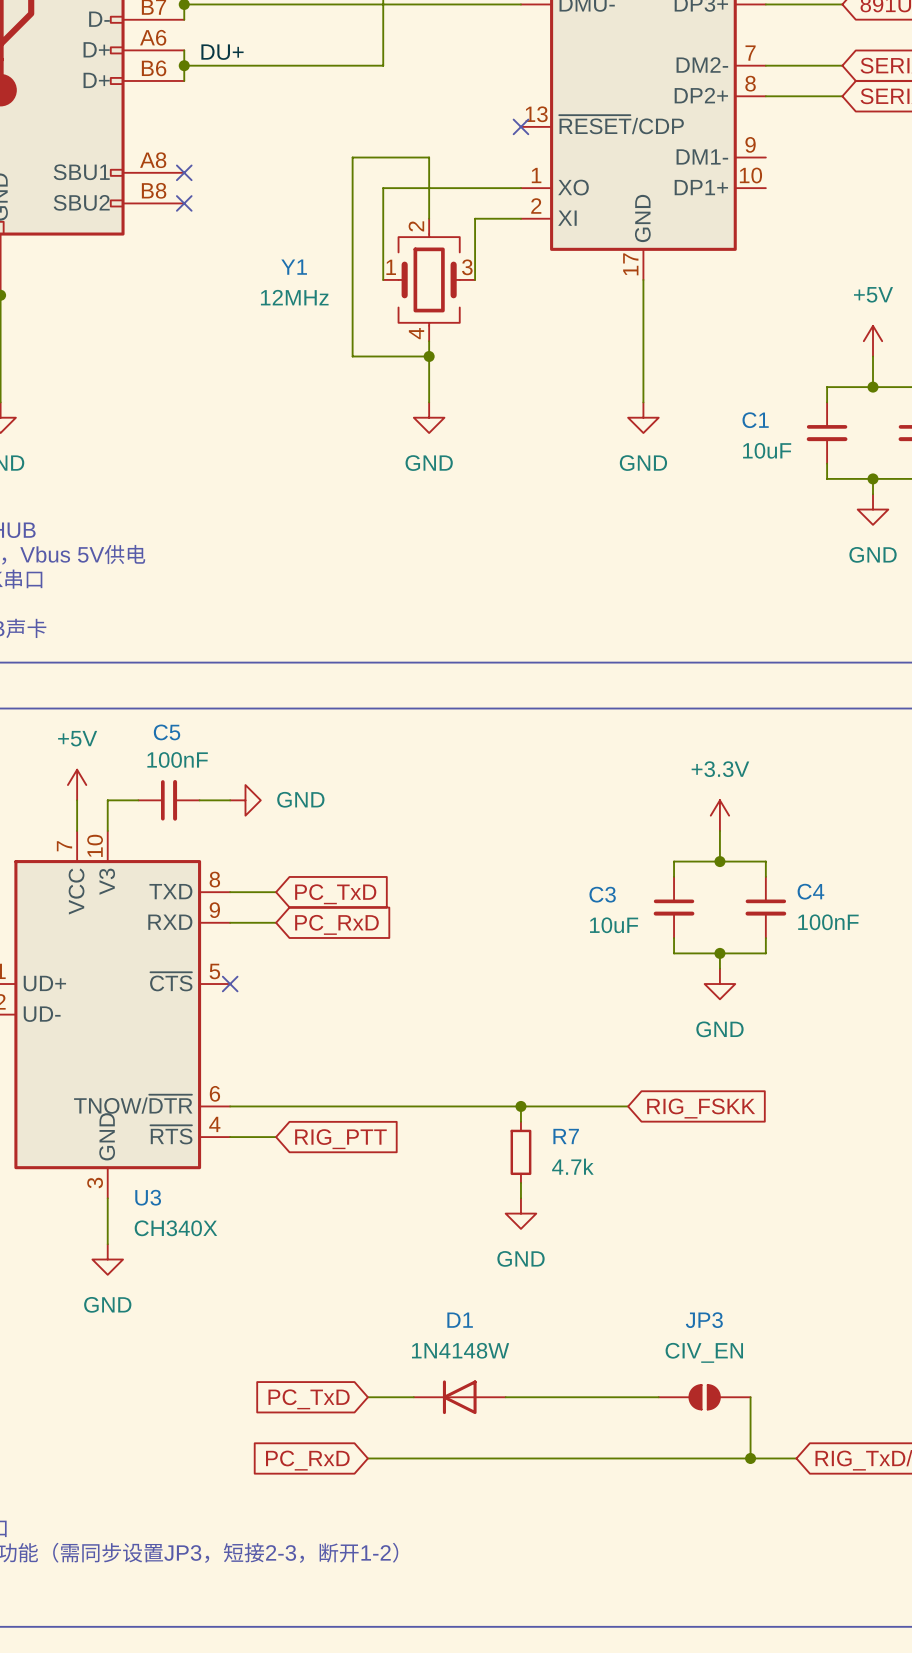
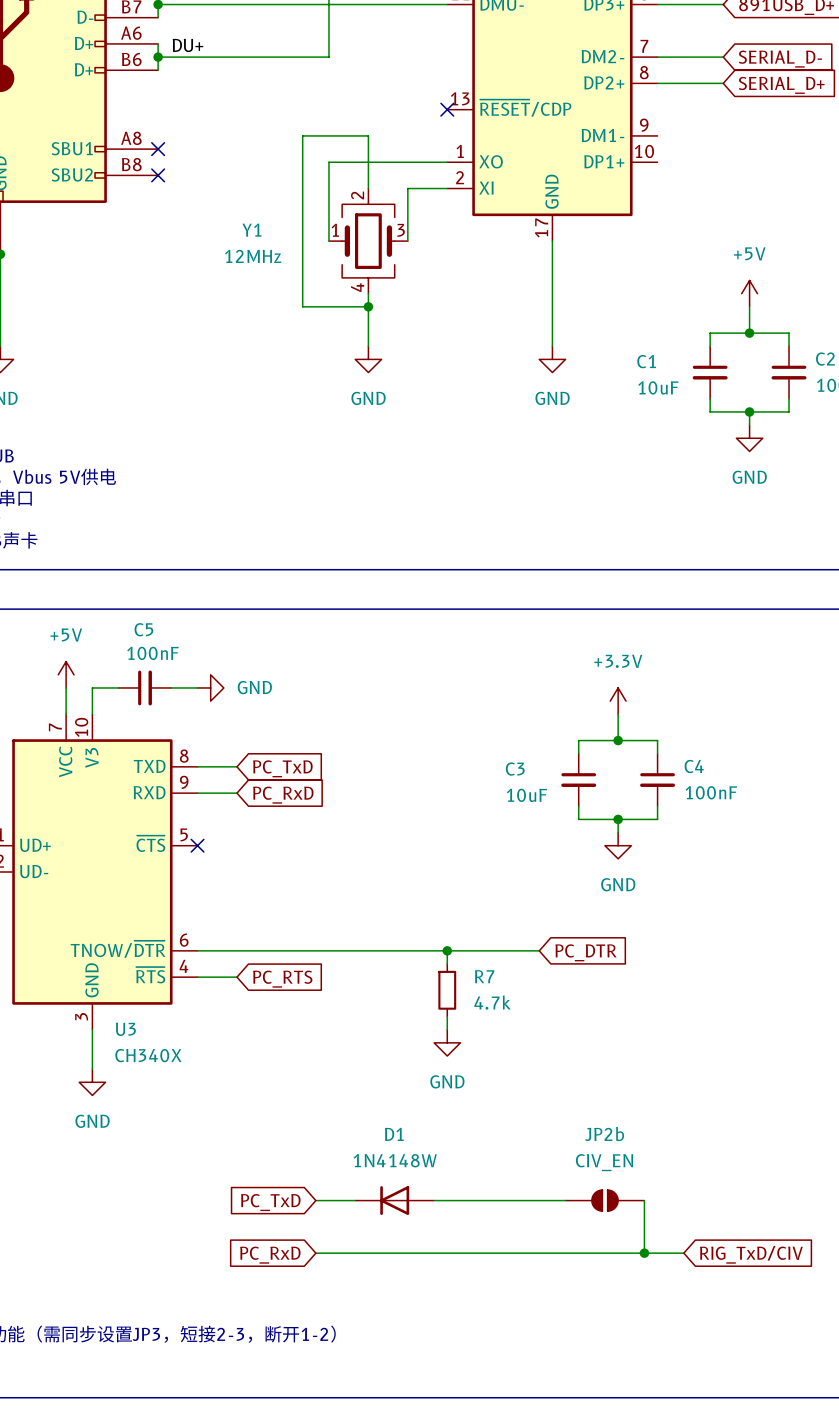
global label: RIG_FSKK (701, 1108) -> PC_DTR (586, 952)
global label: RIG_PTT (340, 1139) -> PC_RTS (282, 979)
JP3 name: JP3 (704, 1320) -> JP2b (604, 1134)

